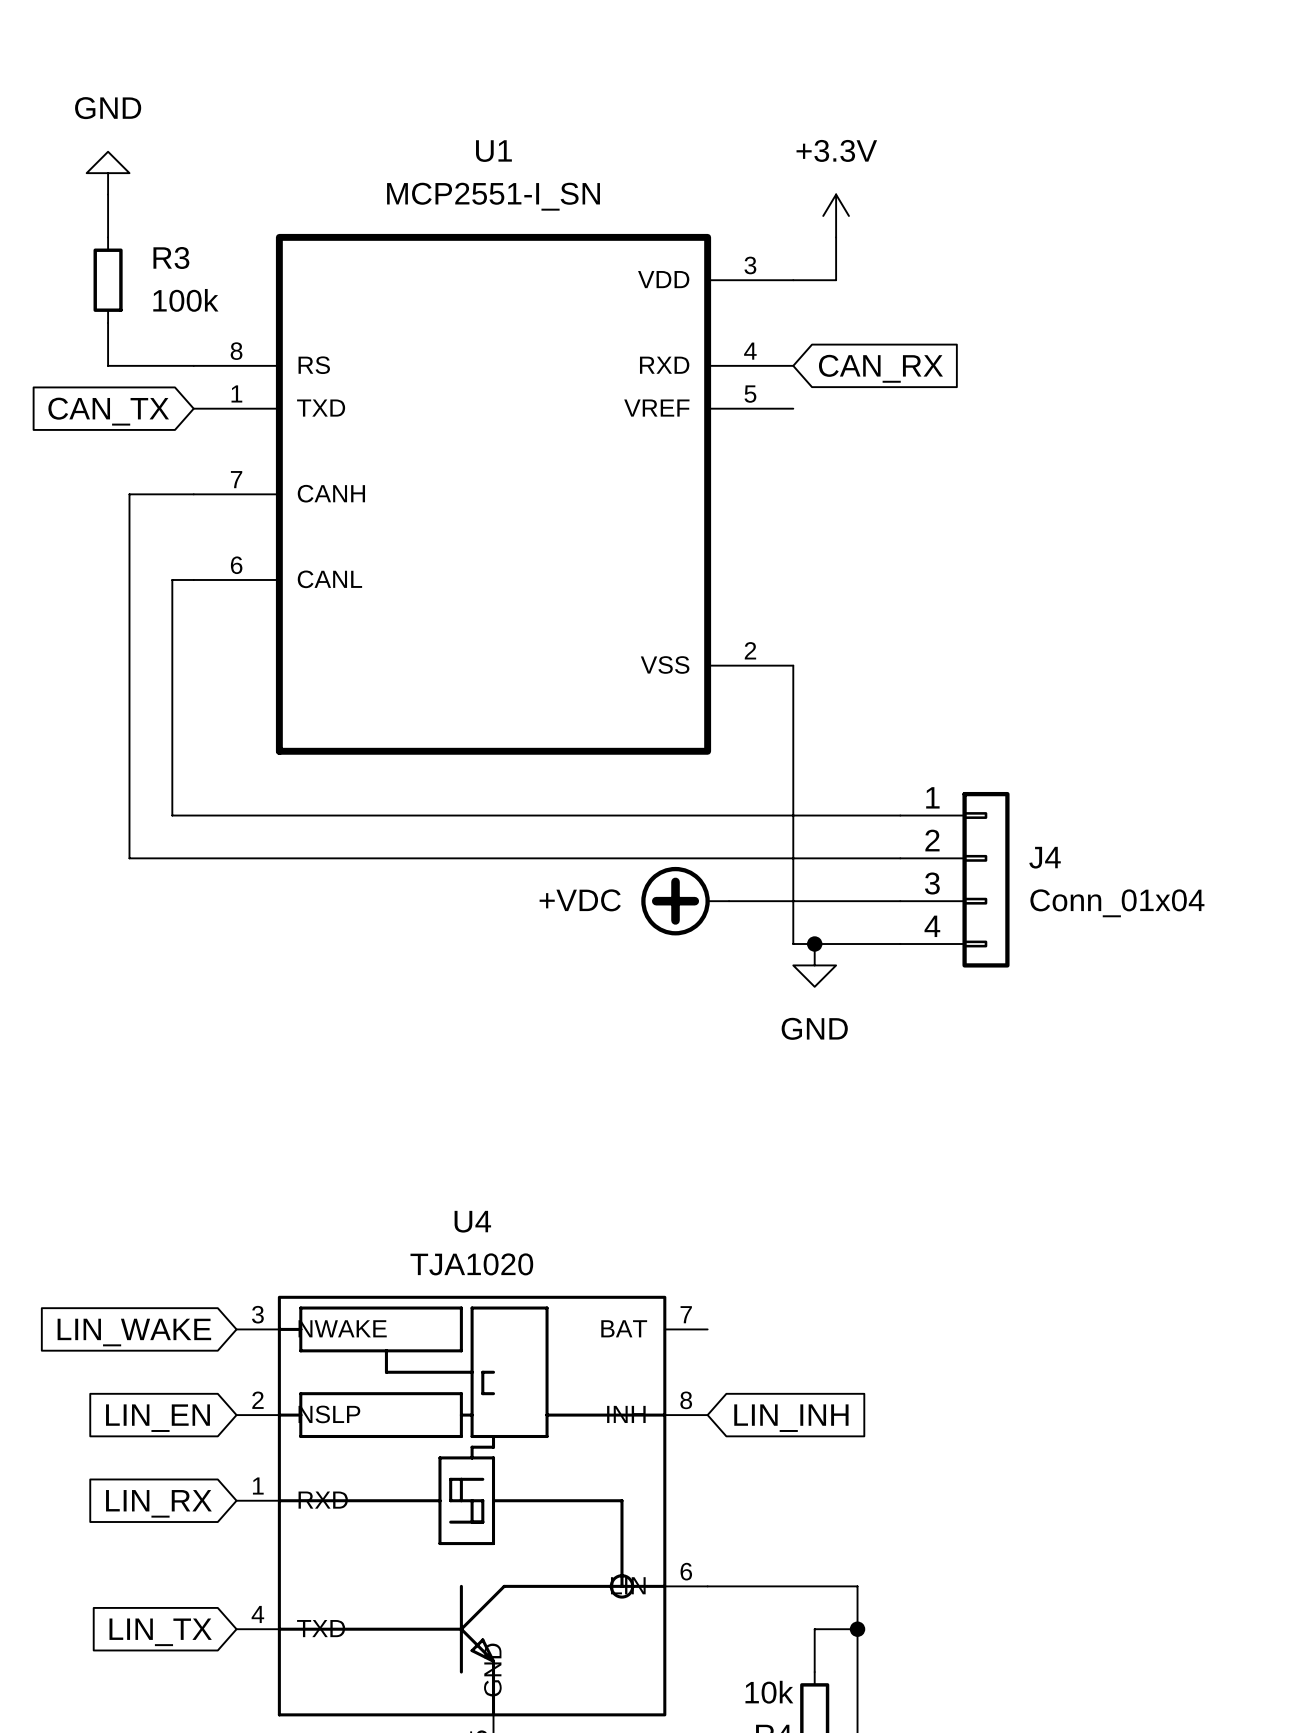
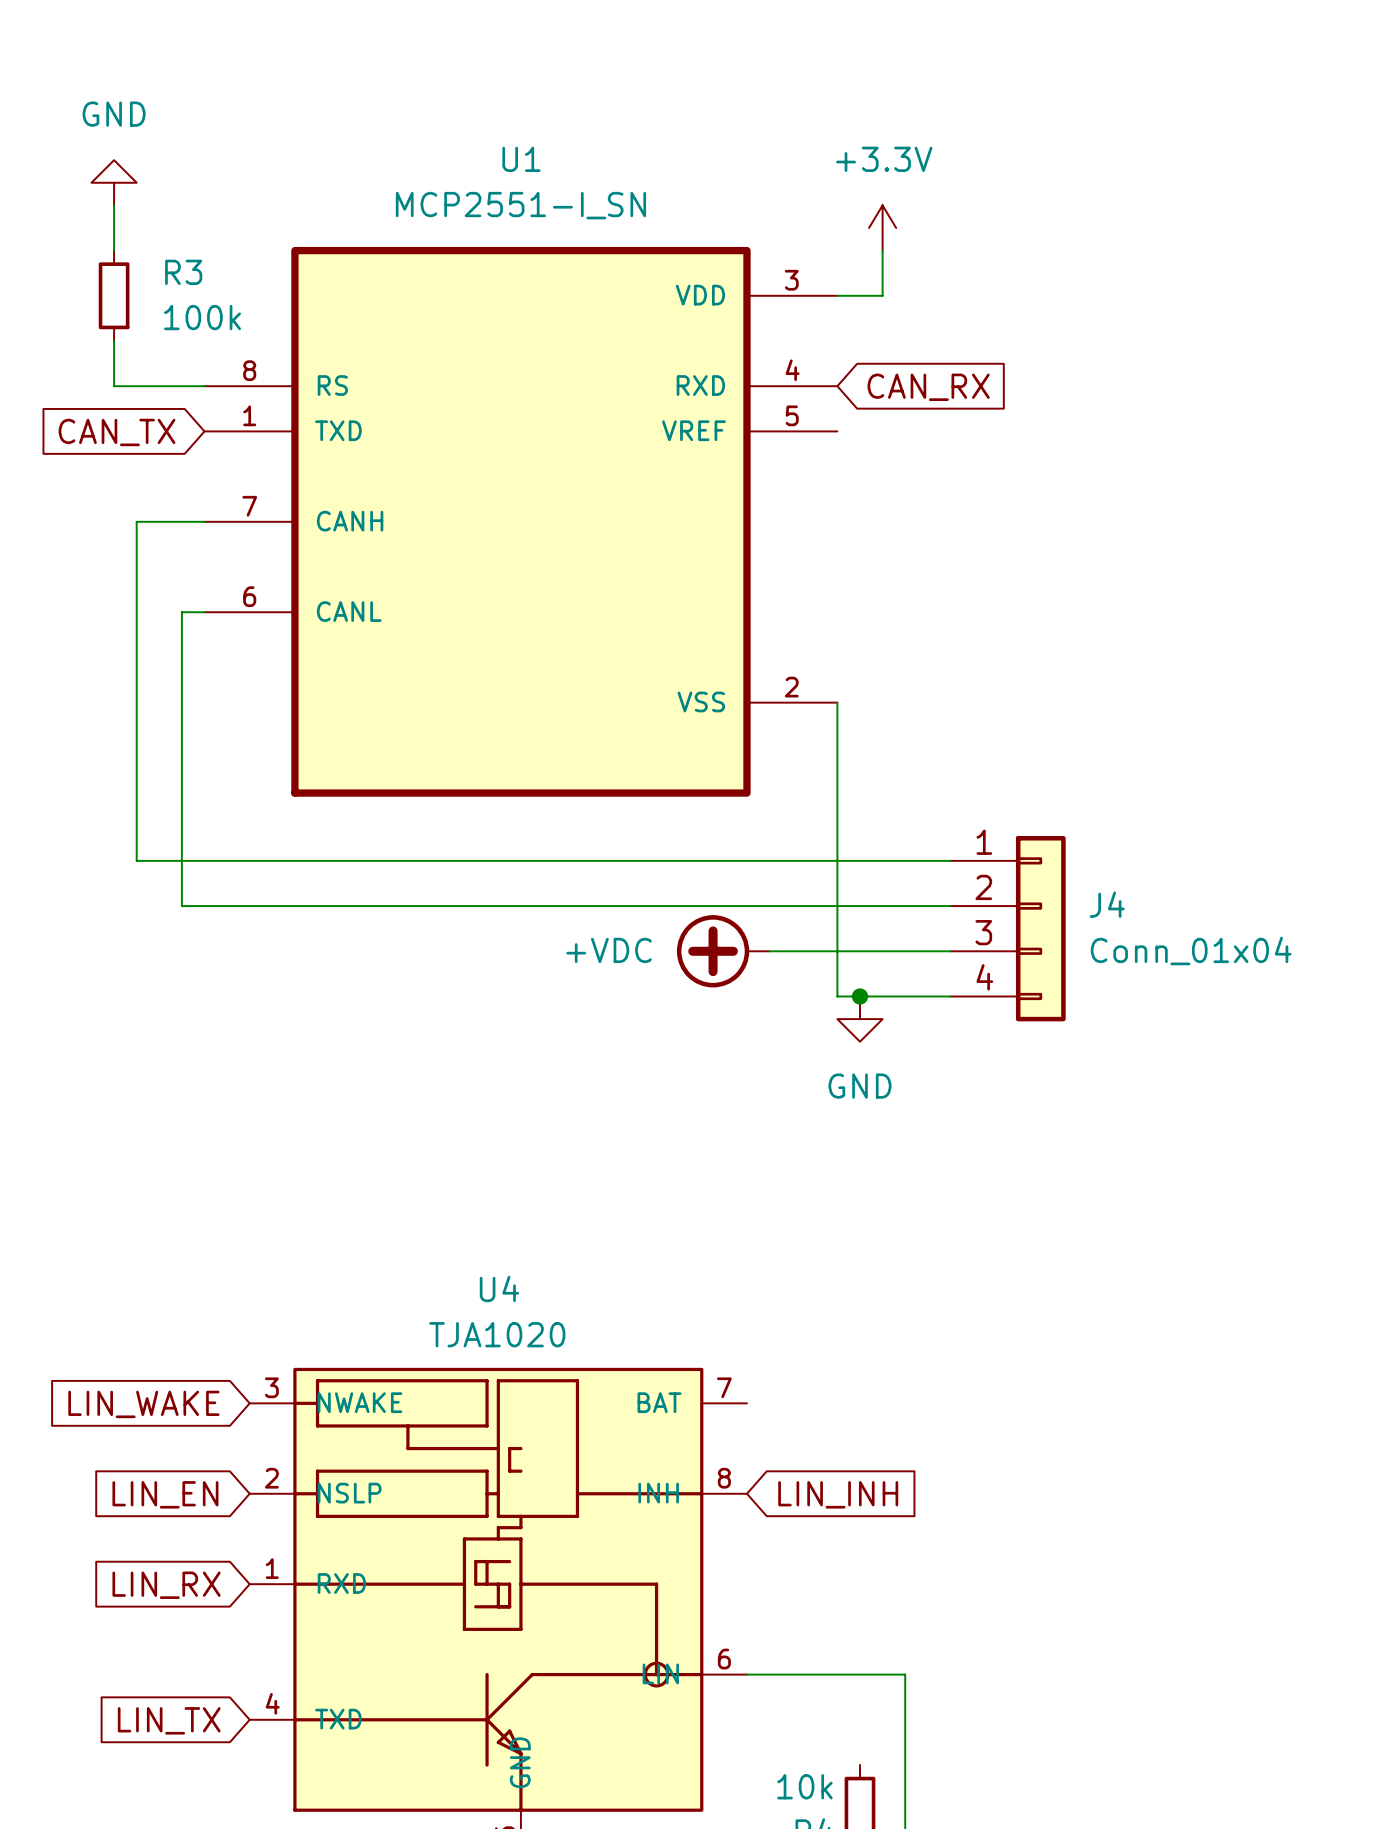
wire: (129, 815) (129, 858) (172, 858) -> (136, 860) (181, 860) (181, 906)
wire: (857, 1629) (814, 1629) (814, 1672) -> none
junction: (857, 1629) -> none

